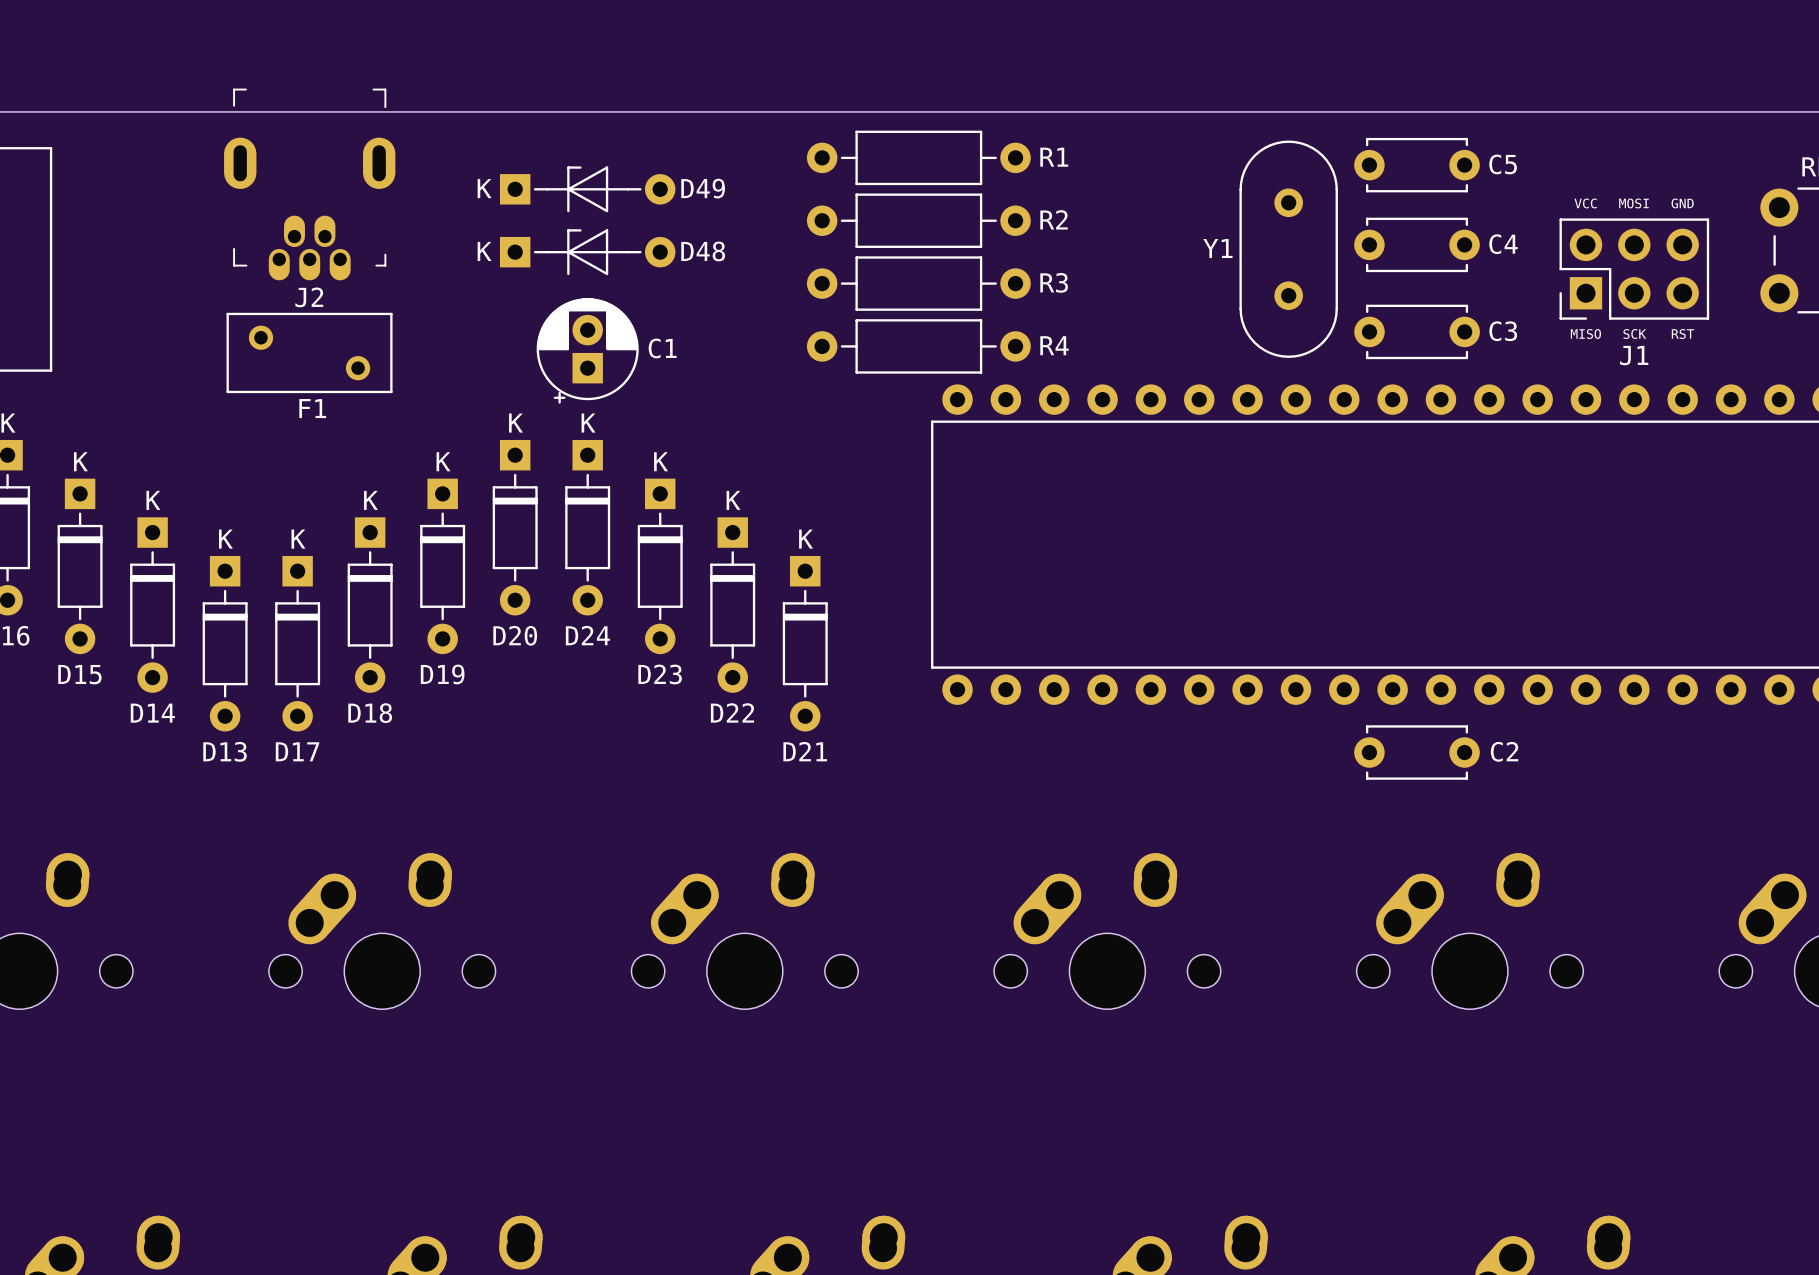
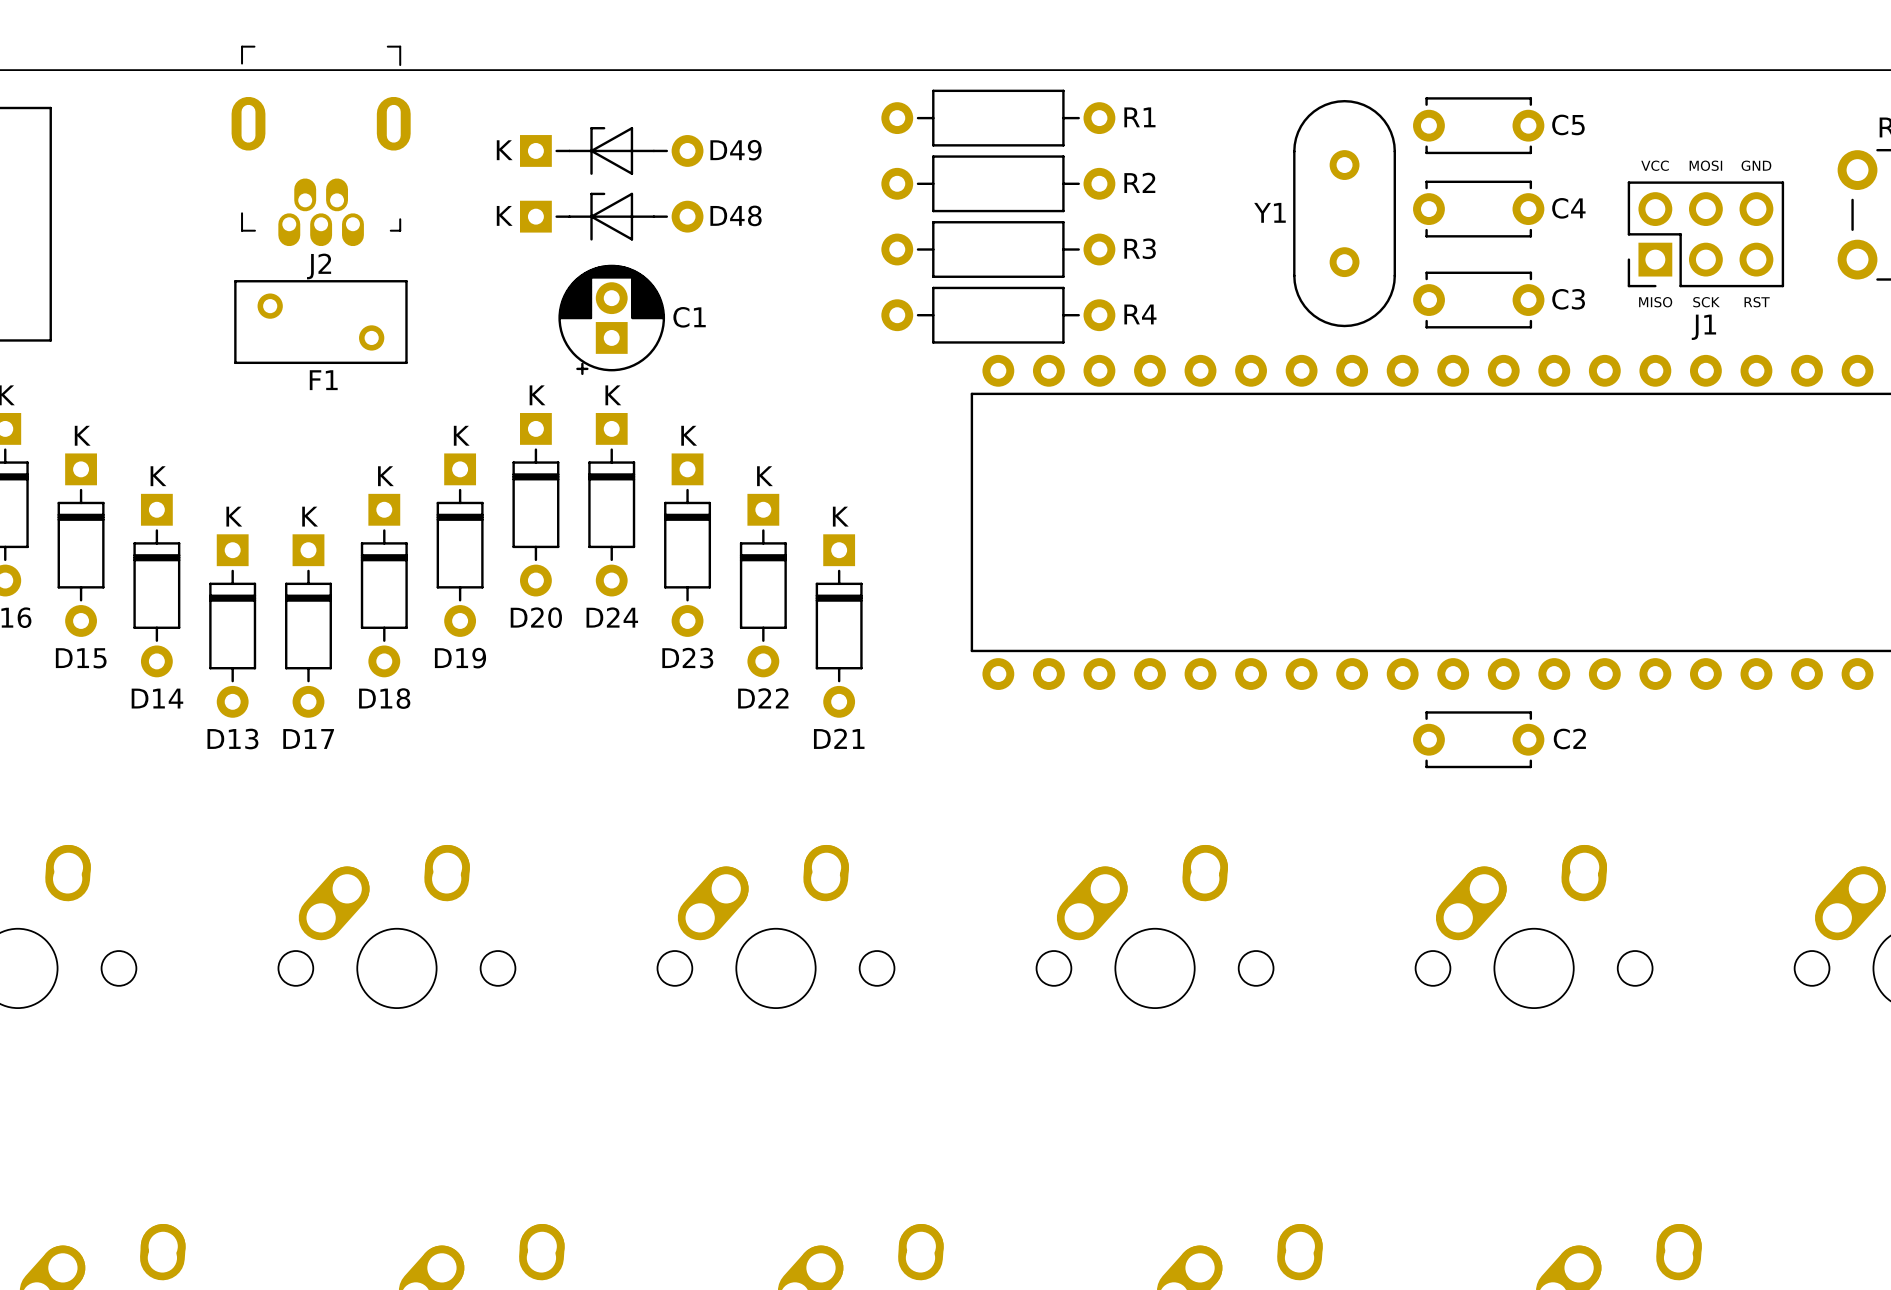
R1 position: (918, 157) -> (998, 118)
R2 position: (918, 220) -> (998, 183)
R3 position: (918, 283) -> (998, 249)
R4 position: (918, 346) -> (998, 315)

